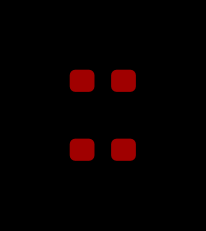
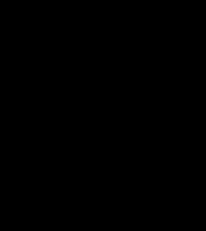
part: (102, 80) -> none
part: (102, 149) -> none

